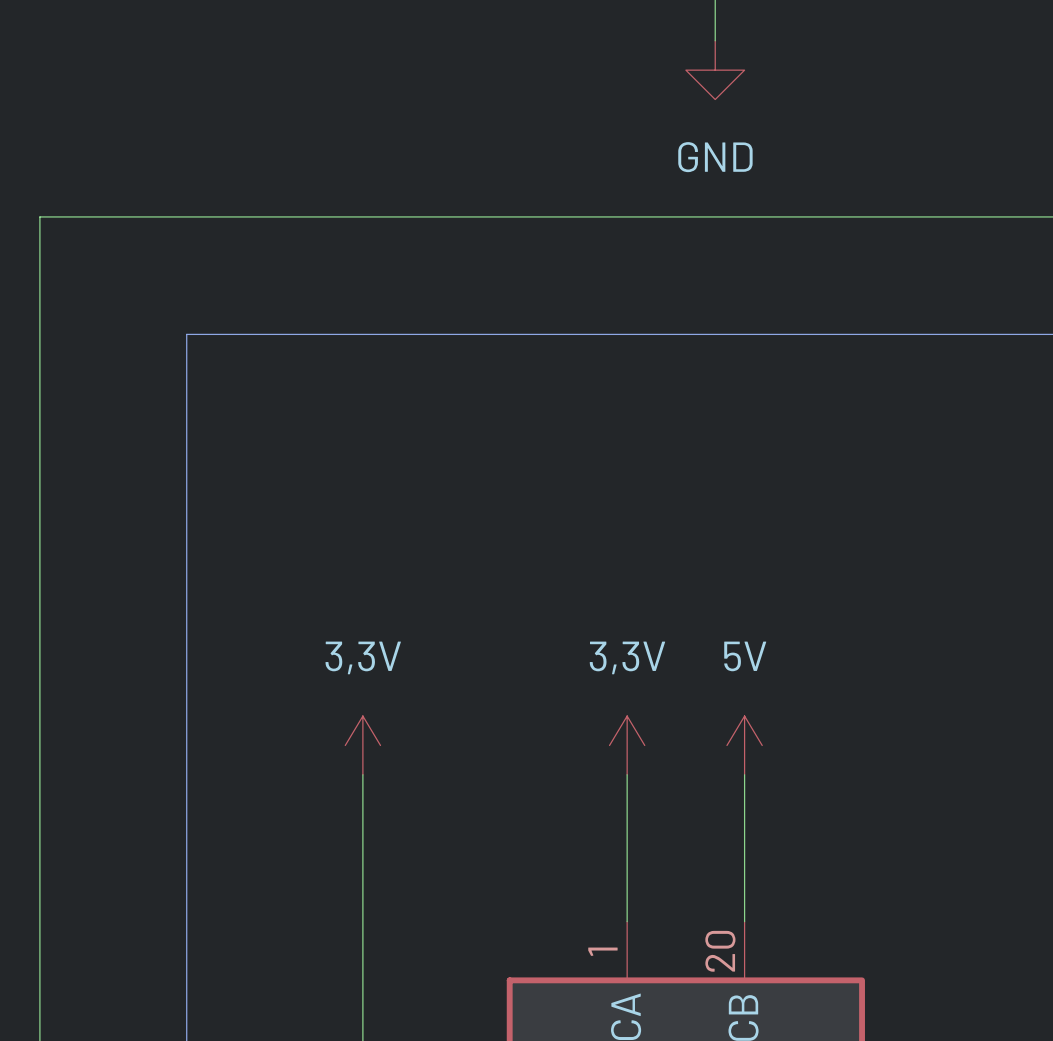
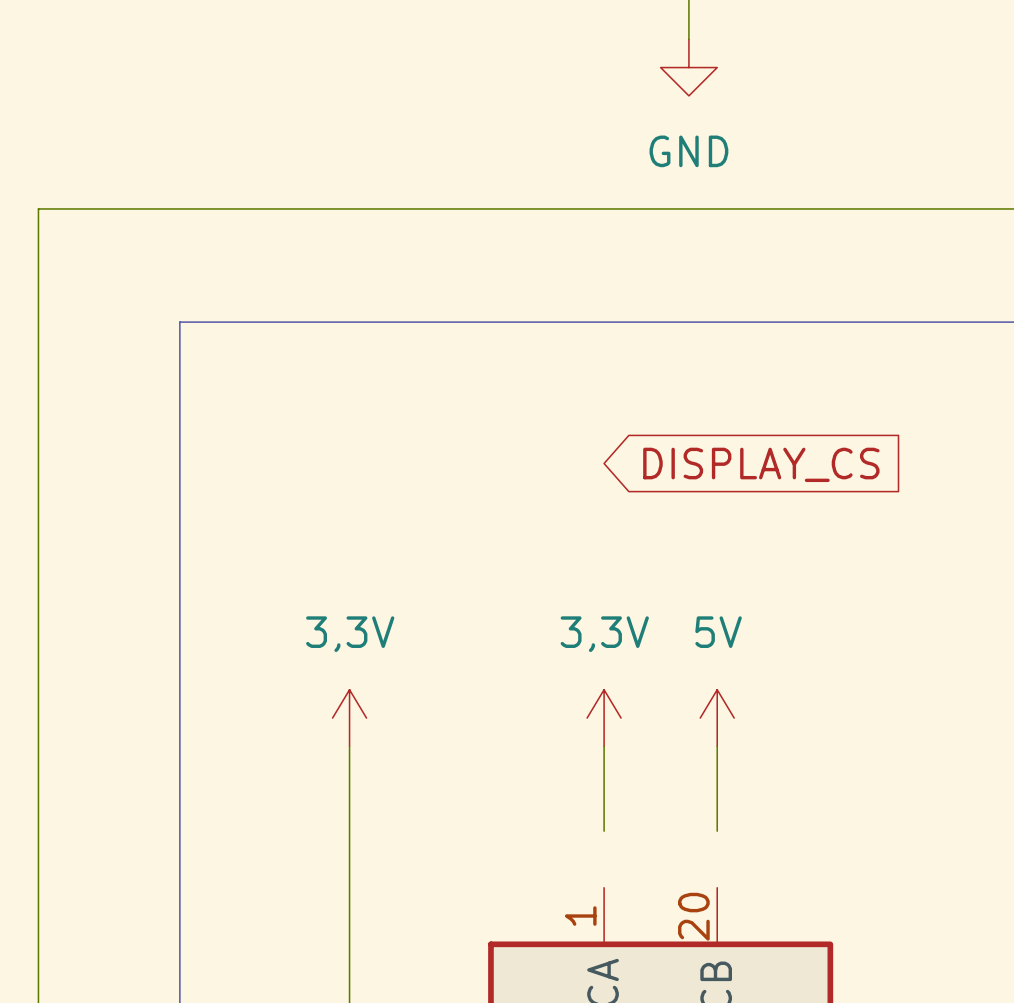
global label: none -> DISPLAY_CS (761, 464)
wire: (627, 862) (627, 921) -> none
wire: (744, 862) (744, 921) -> none

